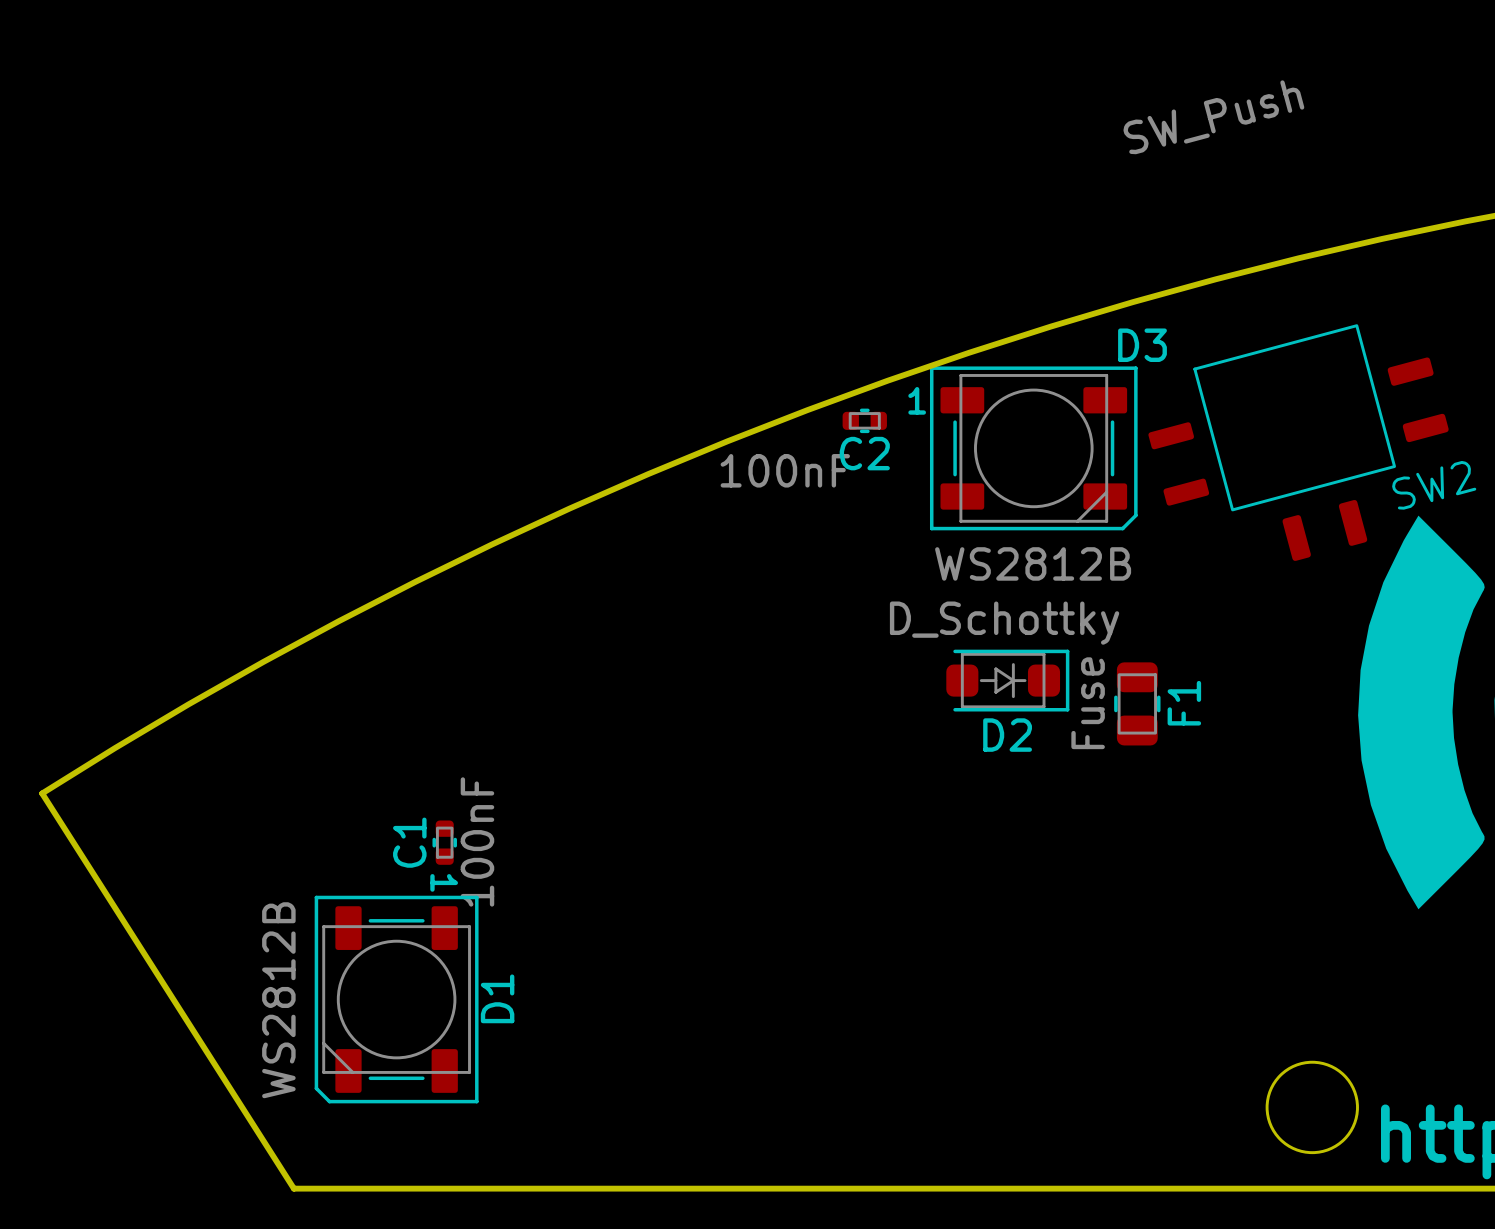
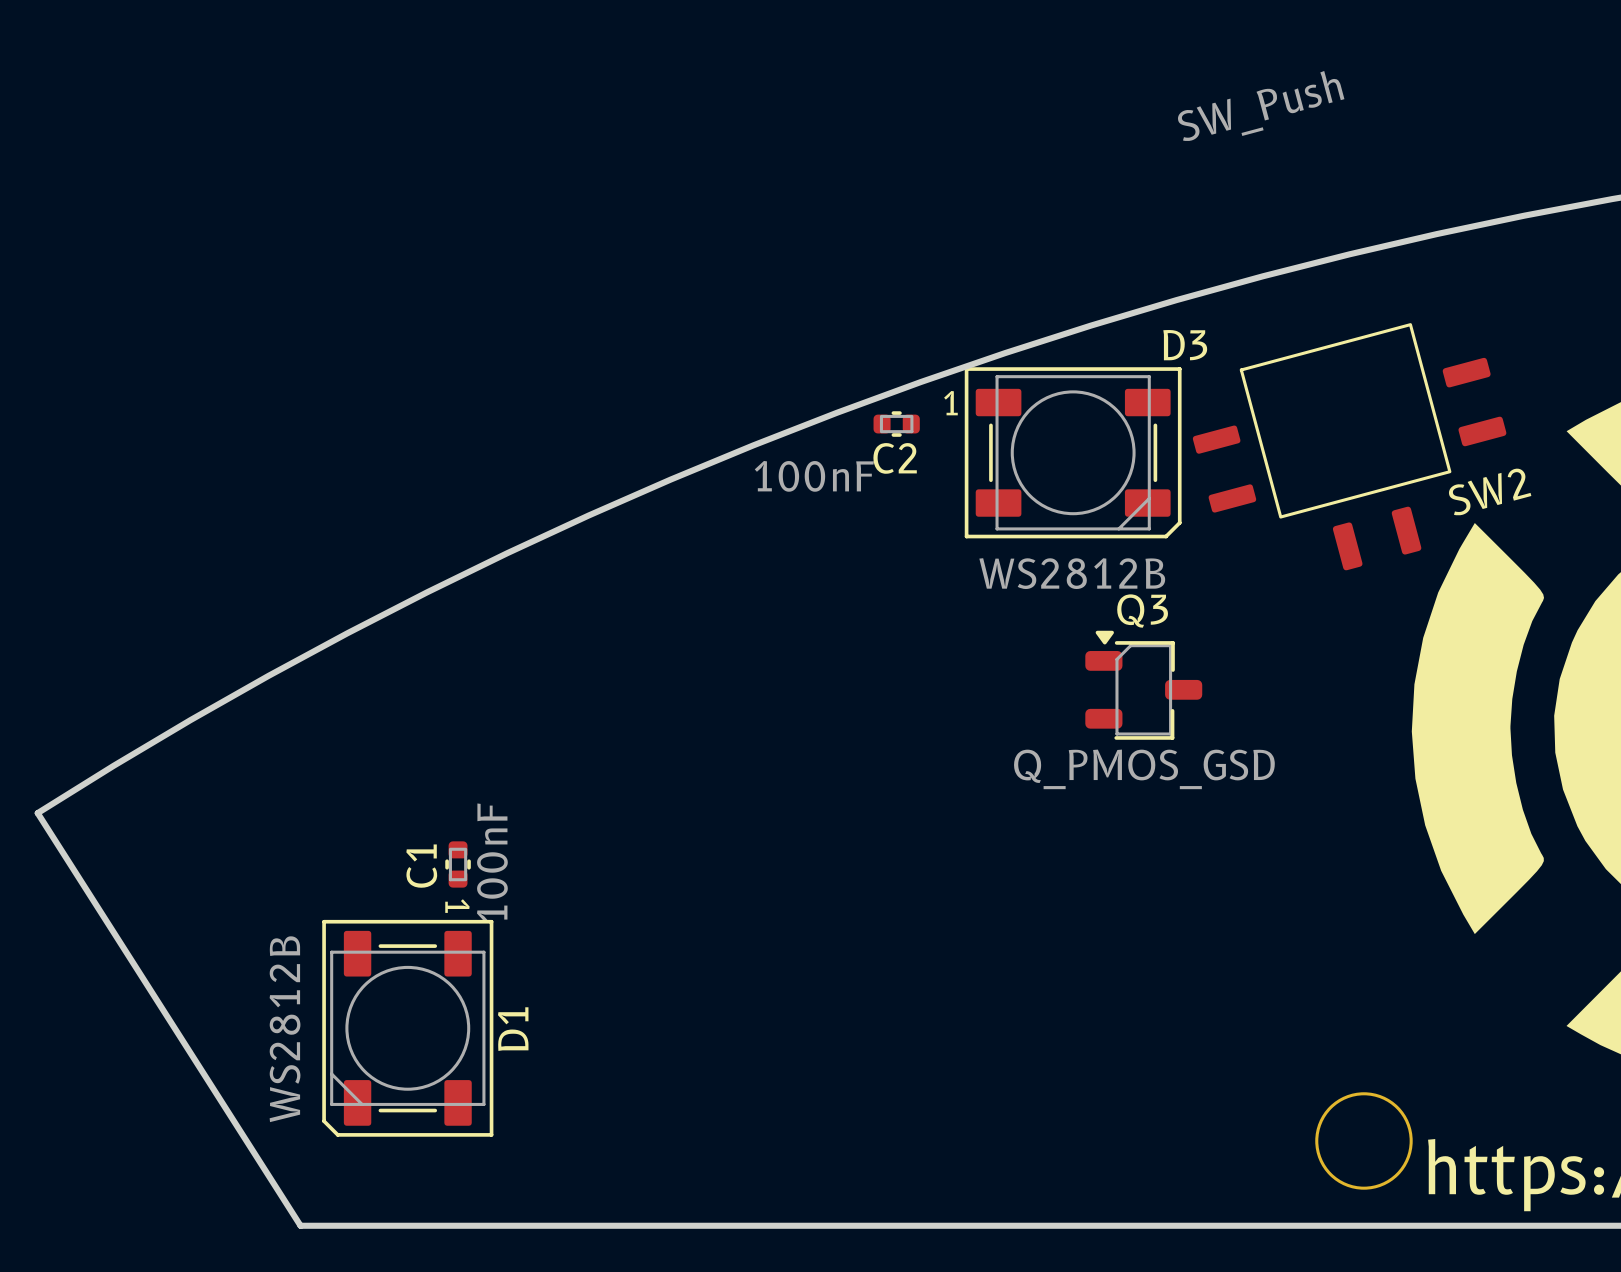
Q3: none -> Q_PMOS_GSD (1143, 685)
D2: D_Schottky (1007, 680) -> none
F1: Fuse (1137, 703) -> none

